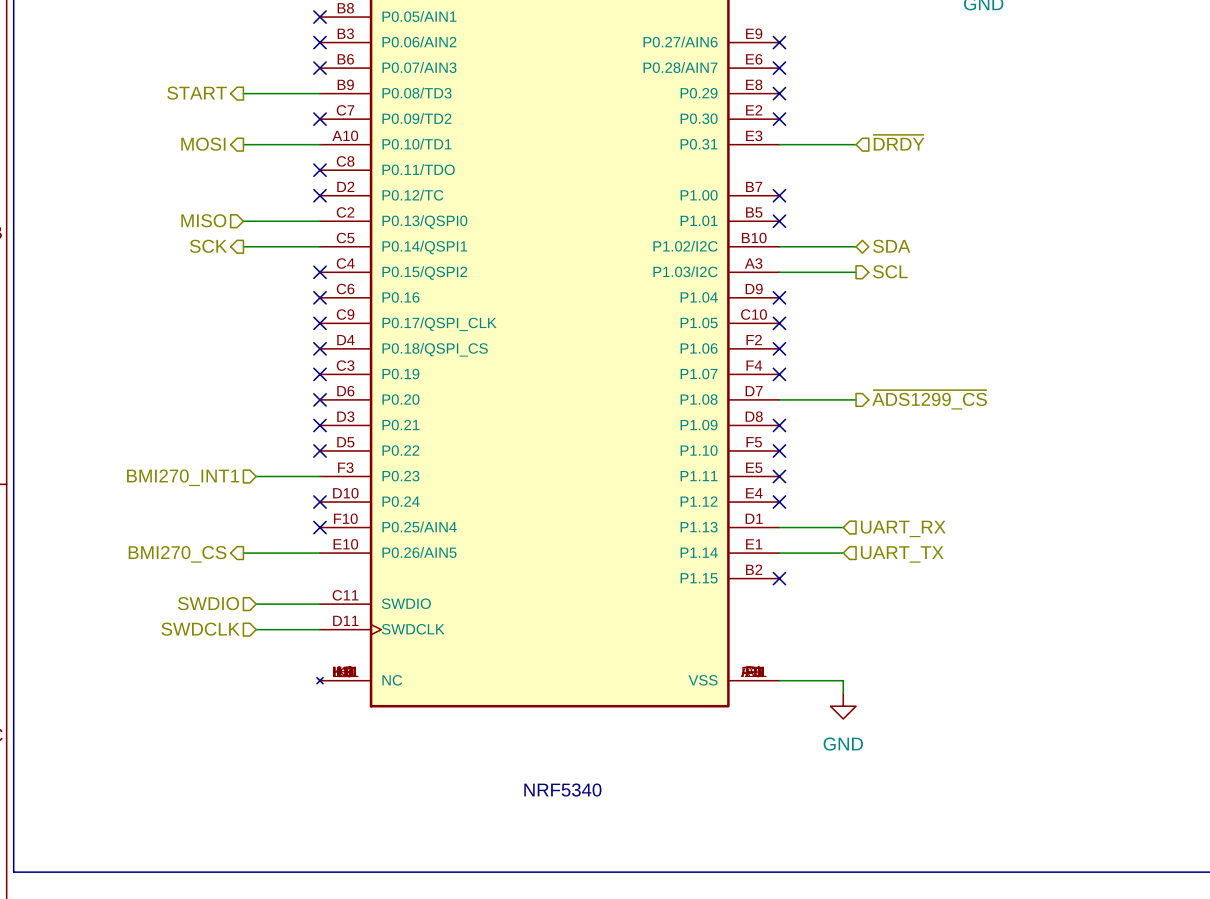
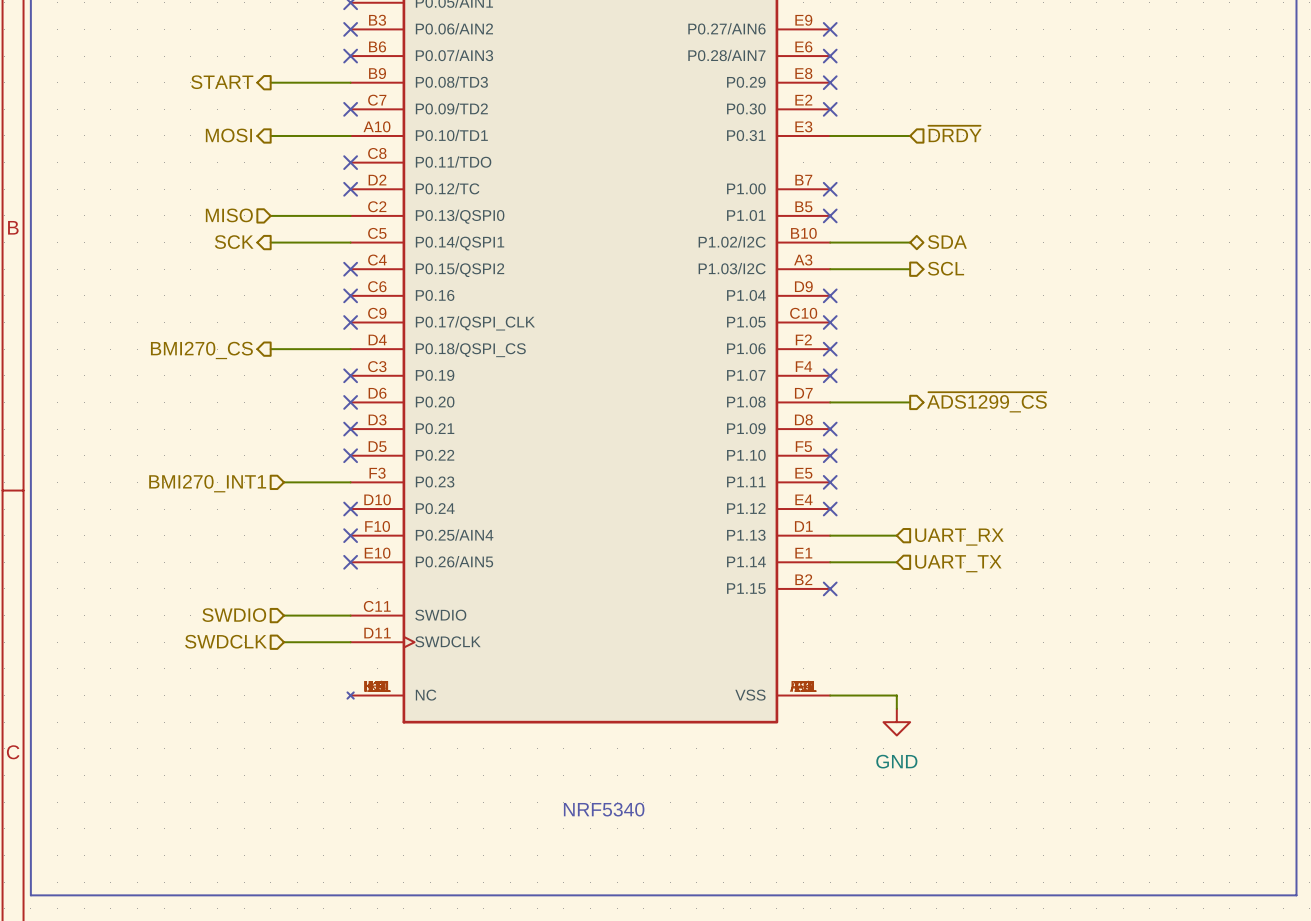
no-connect mark: (320, 348) -> none
wire: (243, 553) (320, 553) -> (270, 349) (350, 349)
no-connect mark: none -> (350, 562)
hierarchical label position: BMI270_CS (177, 554) -> BMI270_CS (201, 350)

